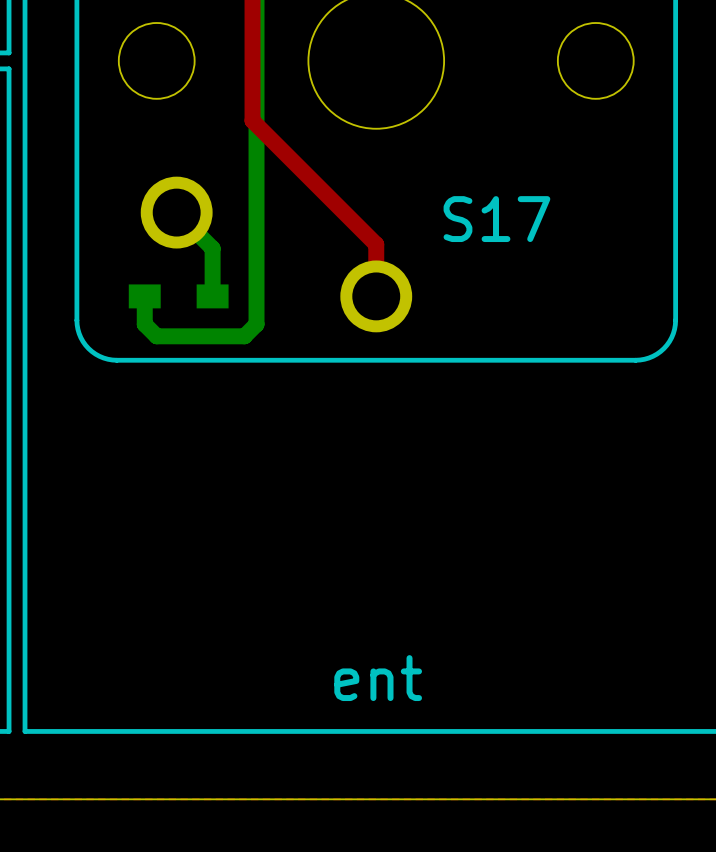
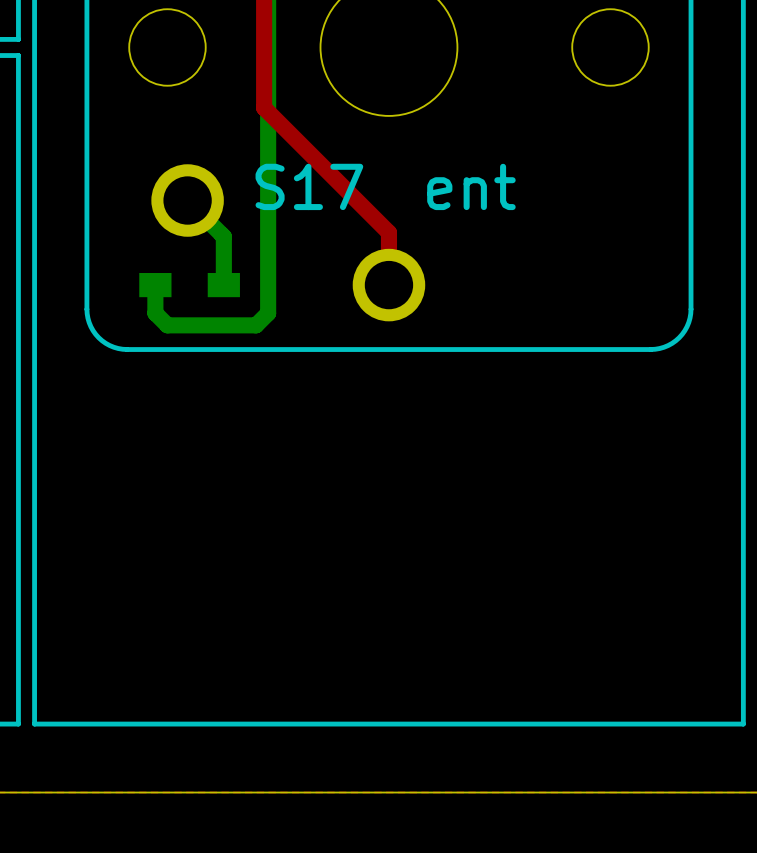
S17 name position: S17 (496, 219) -> S17 (309, 186)
part value position: ent (378, 678) -> ent (471, 186)

